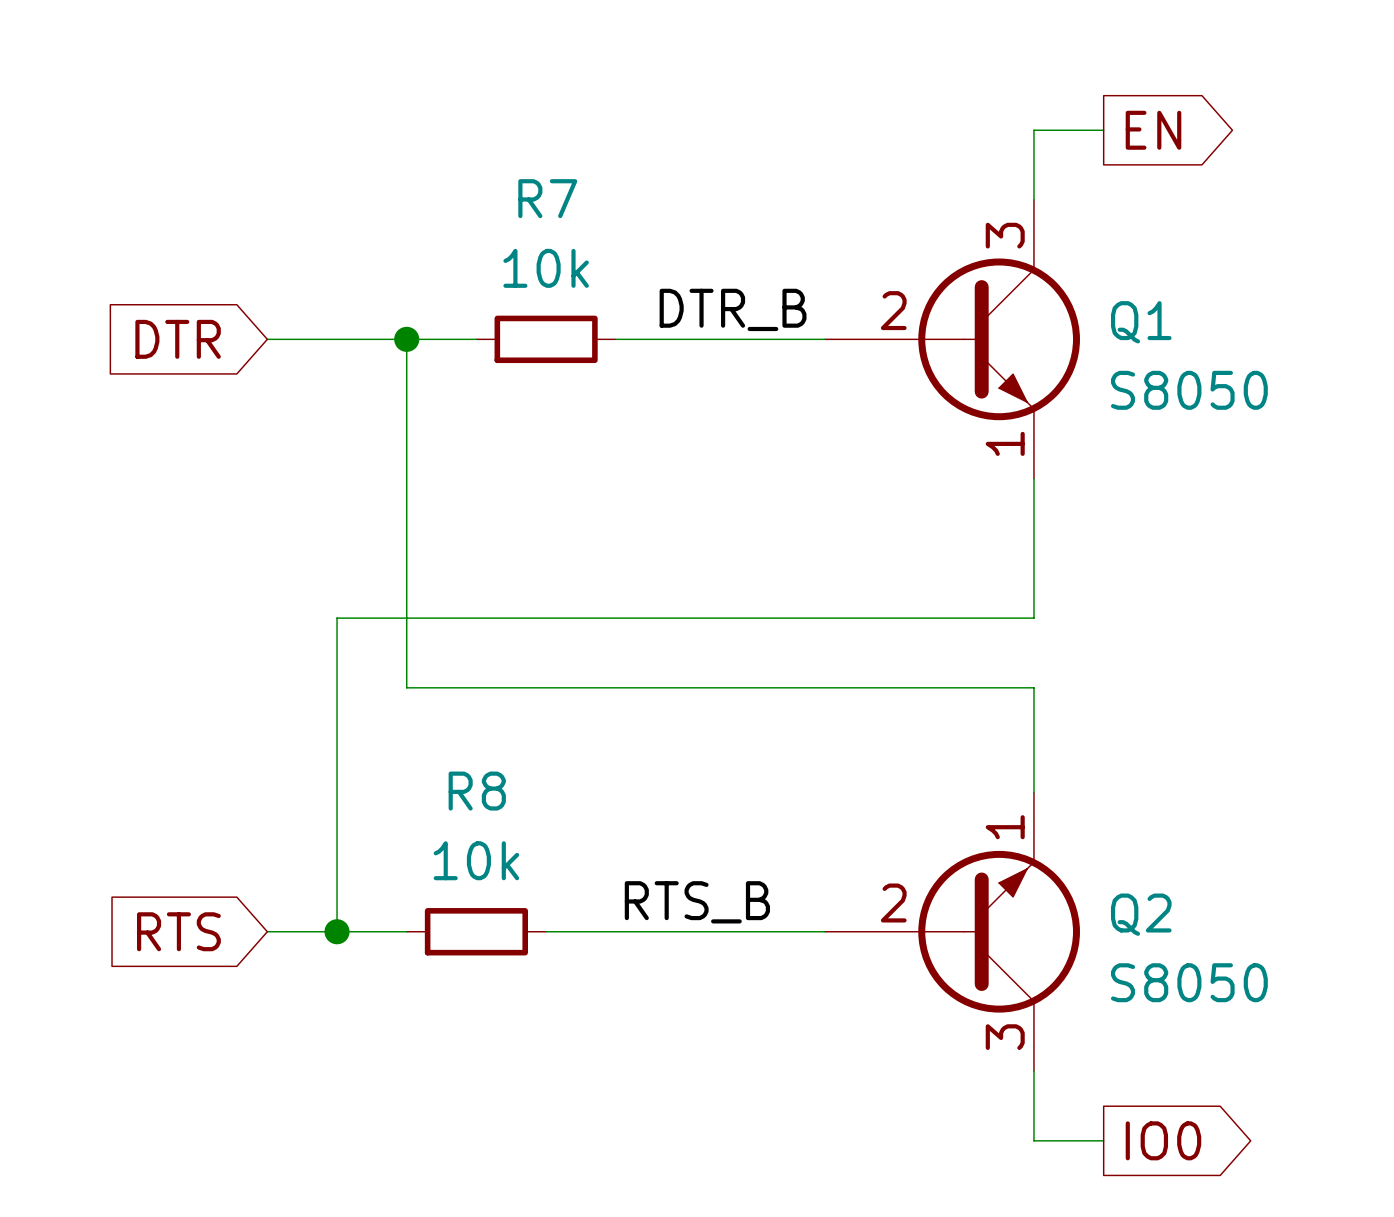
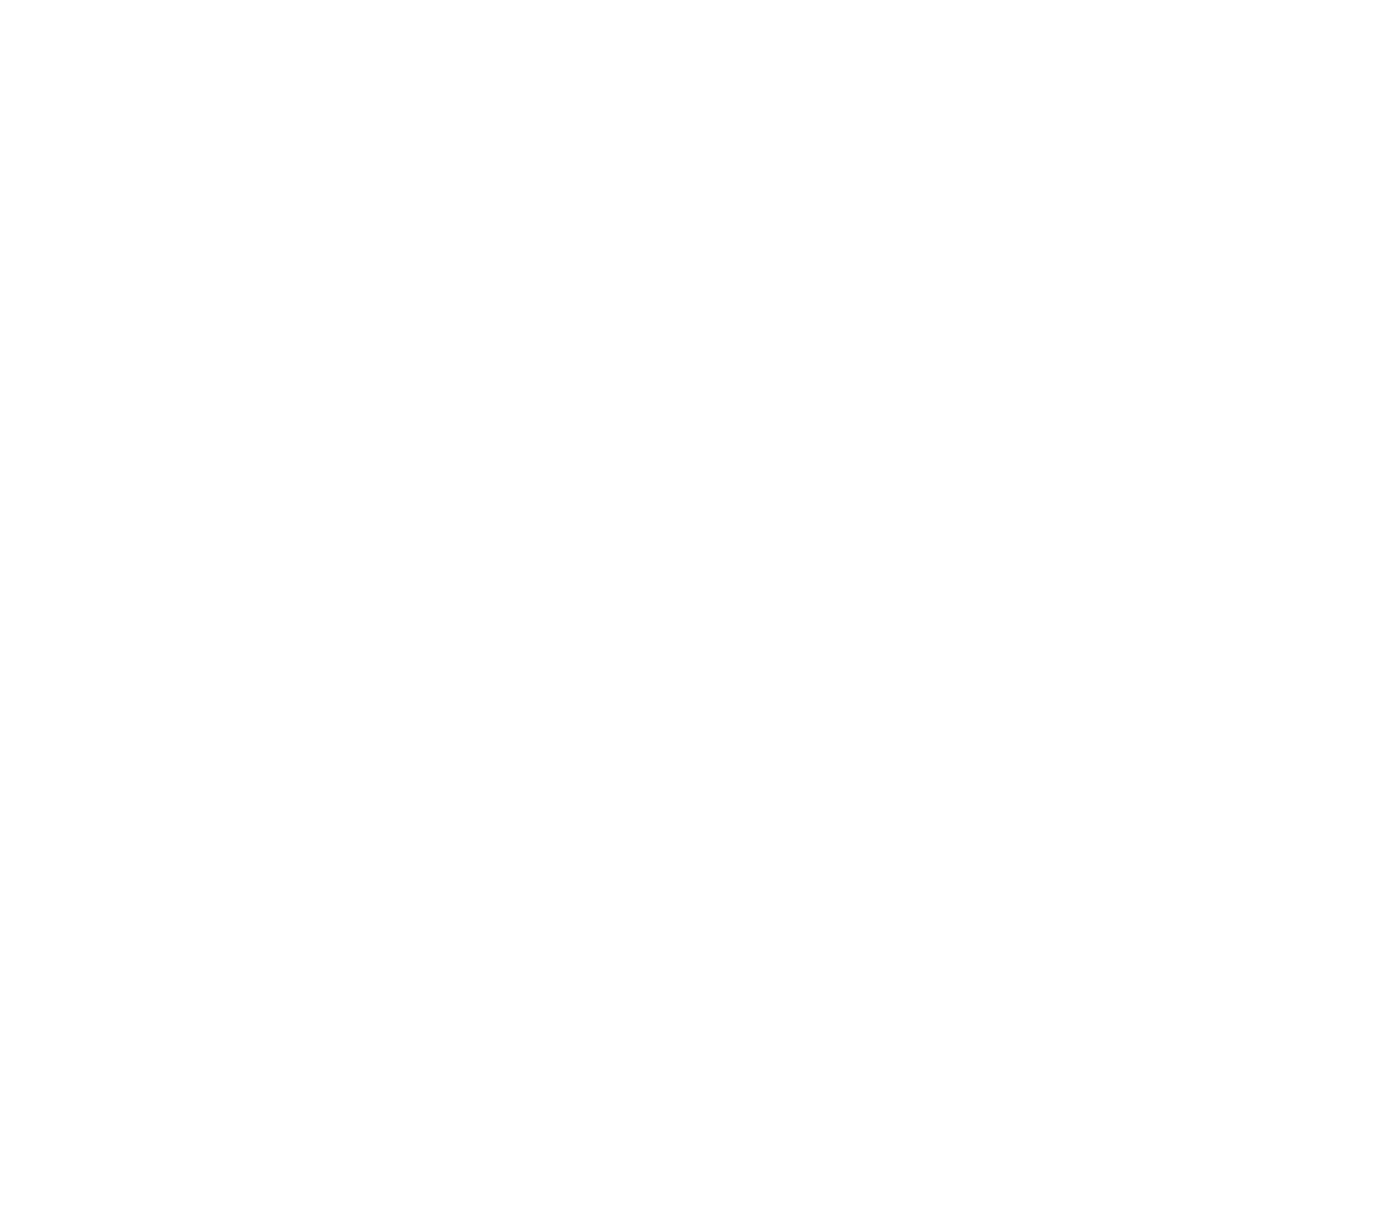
wire: (1103, 130) (1033, 130) (1033, 199) -> none
global label: EN (1153, 130) -> none
label: DTR_B (733, 309) -> none
global label: DTR (178, 339) -> none
wire: (267, 339) (476, 339) -> none
wire: (406, 339) (406, 687) (1033, 687) (1033, 792) -> none
junction: (406, 339) -> none
R7: 10k (546, 339) -> none
wire: (615, 339) (824, 339) -> none
Q1: S8050 (952, 339) -> none
wire: (1033, 478) (1033, 618) (337, 618) (337, 931) -> none
label: RTS_B (697, 902) -> none
global label: RTS (178, 931) -> none
wire: (267, 931) (406, 931) -> none
junction: (337, 931) -> none
R8: 10k (476, 931) -> none
wire: (546, 931) (824, 931) -> none
Q2: S8050 (952, 931) -> none
wire: (1033, 1071) (1033, 1140) (1103, 1140) -> none
global label: IO0 (1163, 1140) -> none

